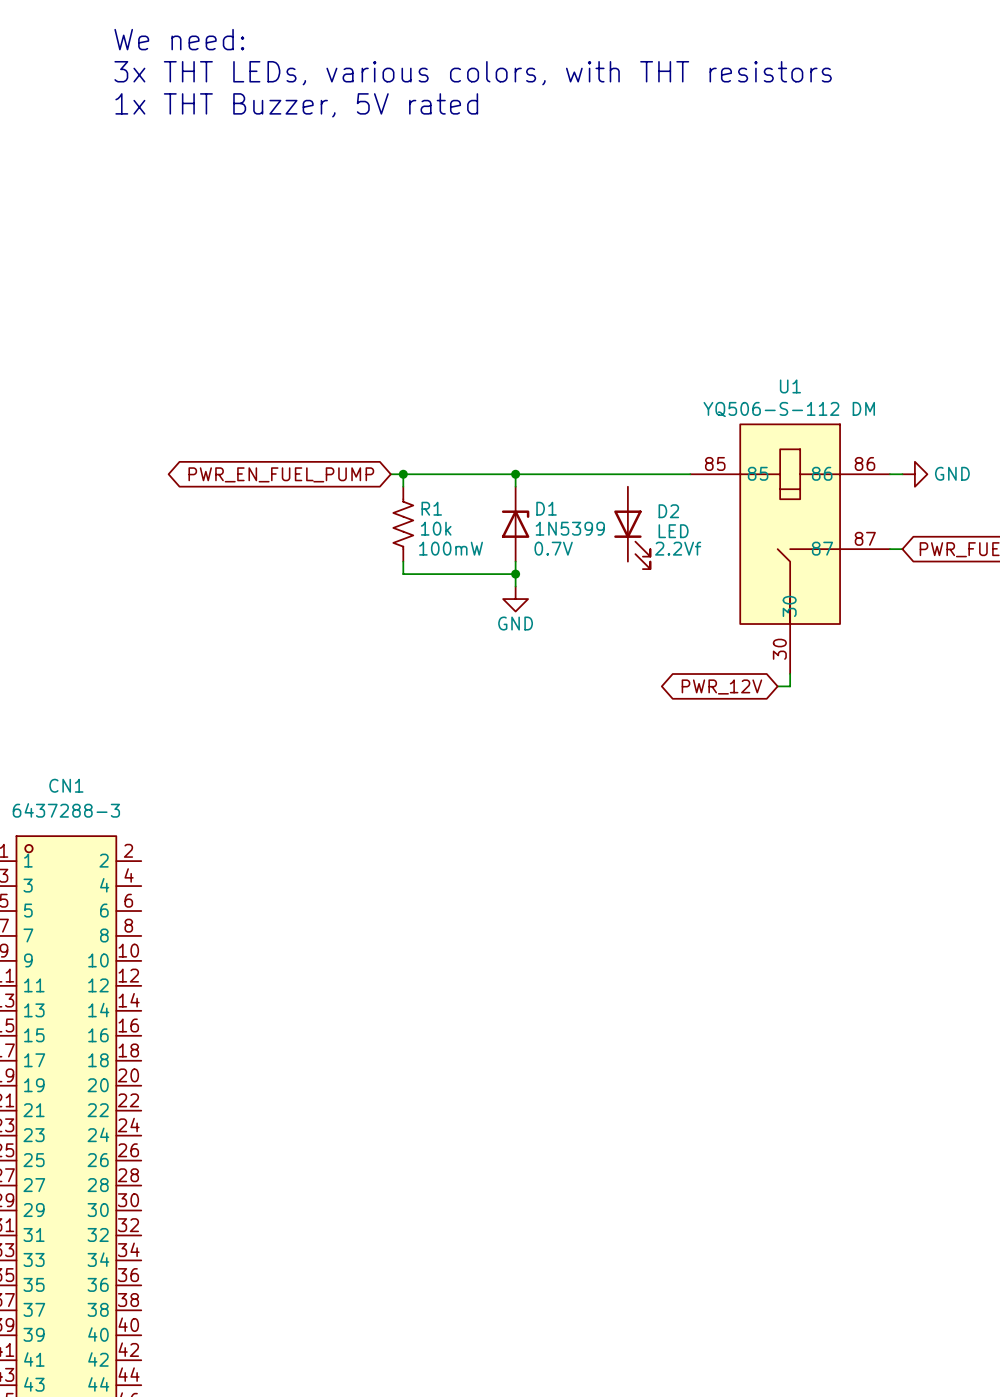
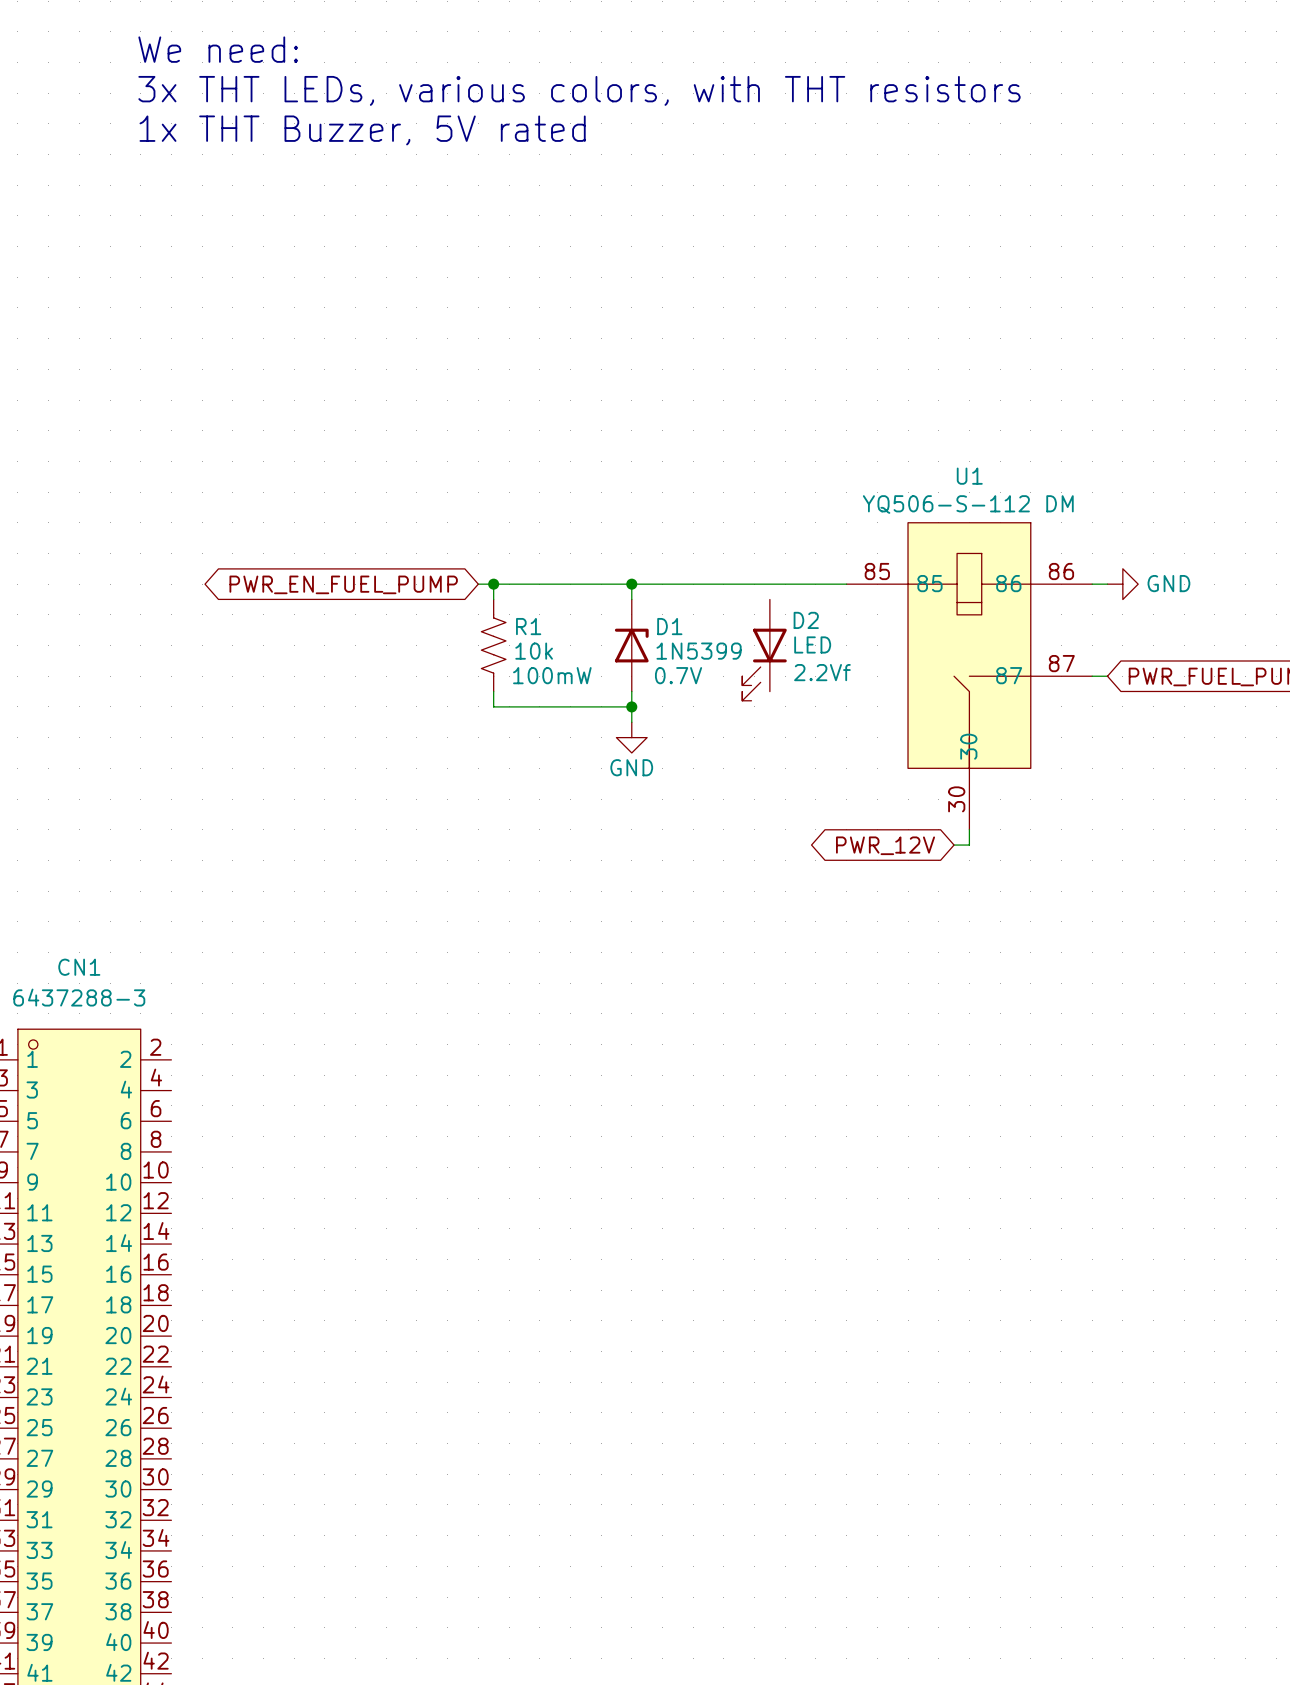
D2 flip: as is (632, 539) -> left-right (764, 664)

